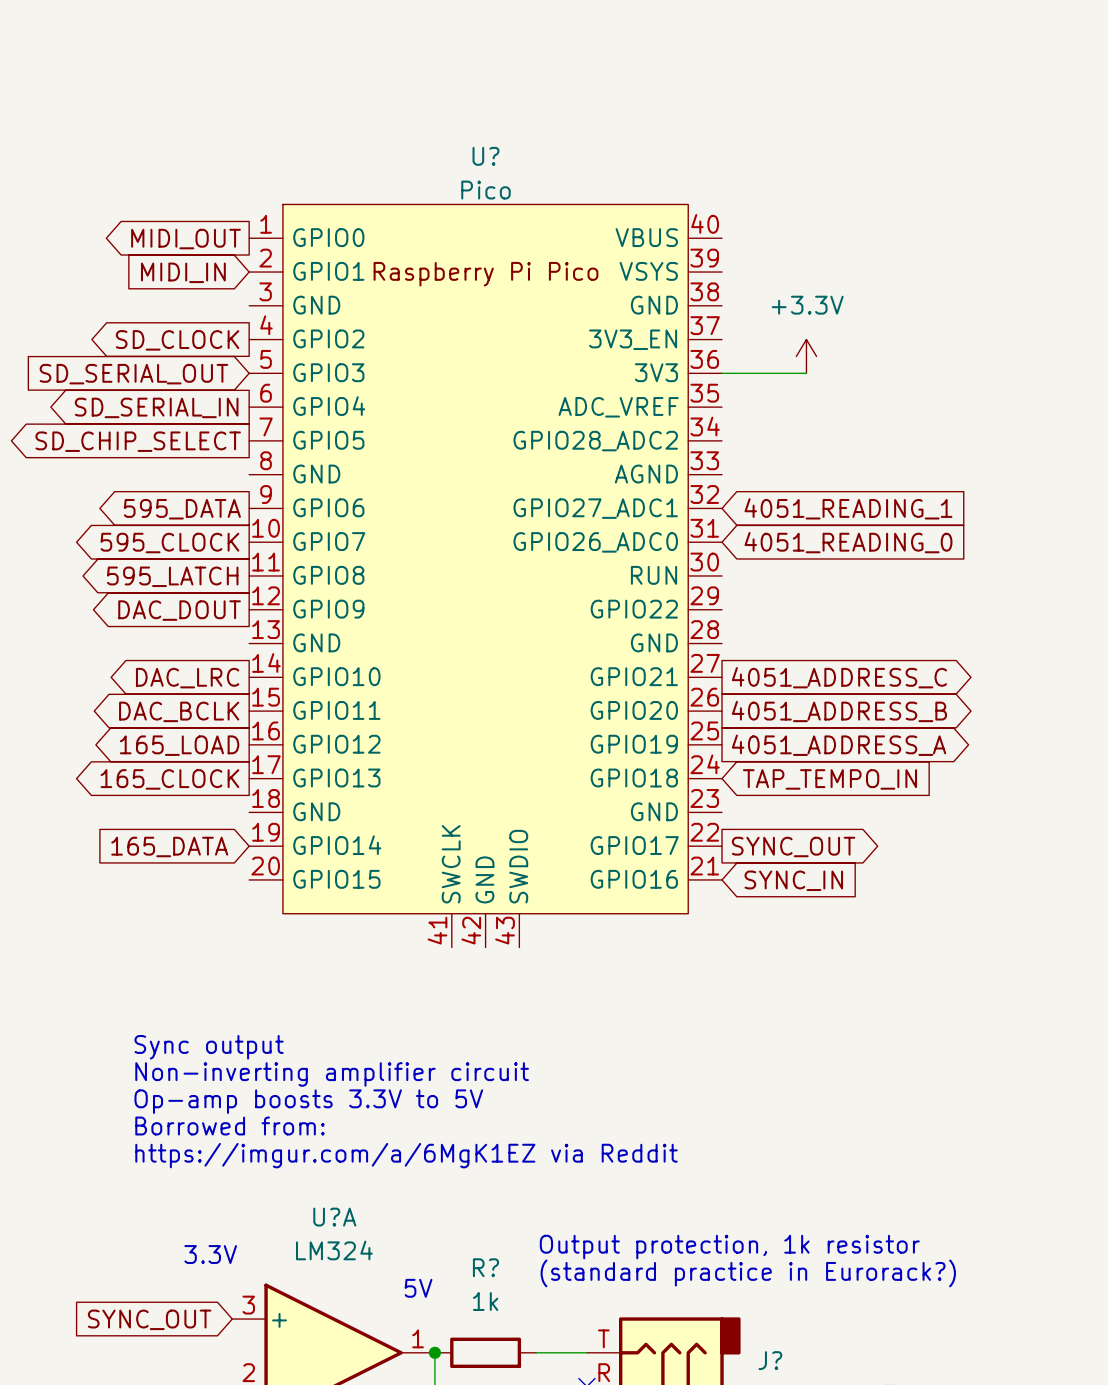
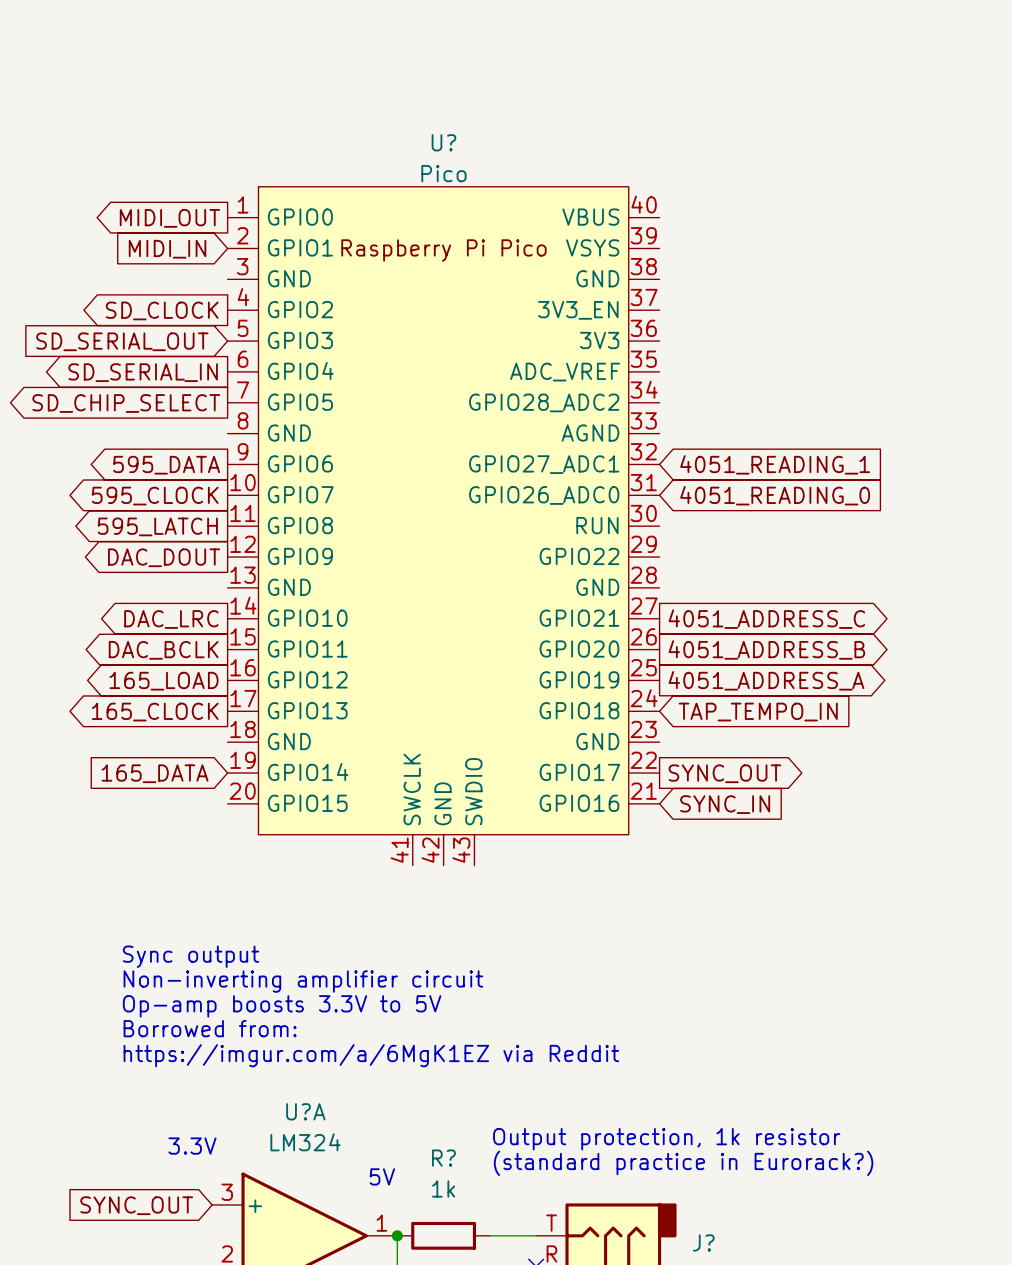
power symbol: +3.3V (806, 356) -> none
wire: (722, 373) (806, 373) -> none

